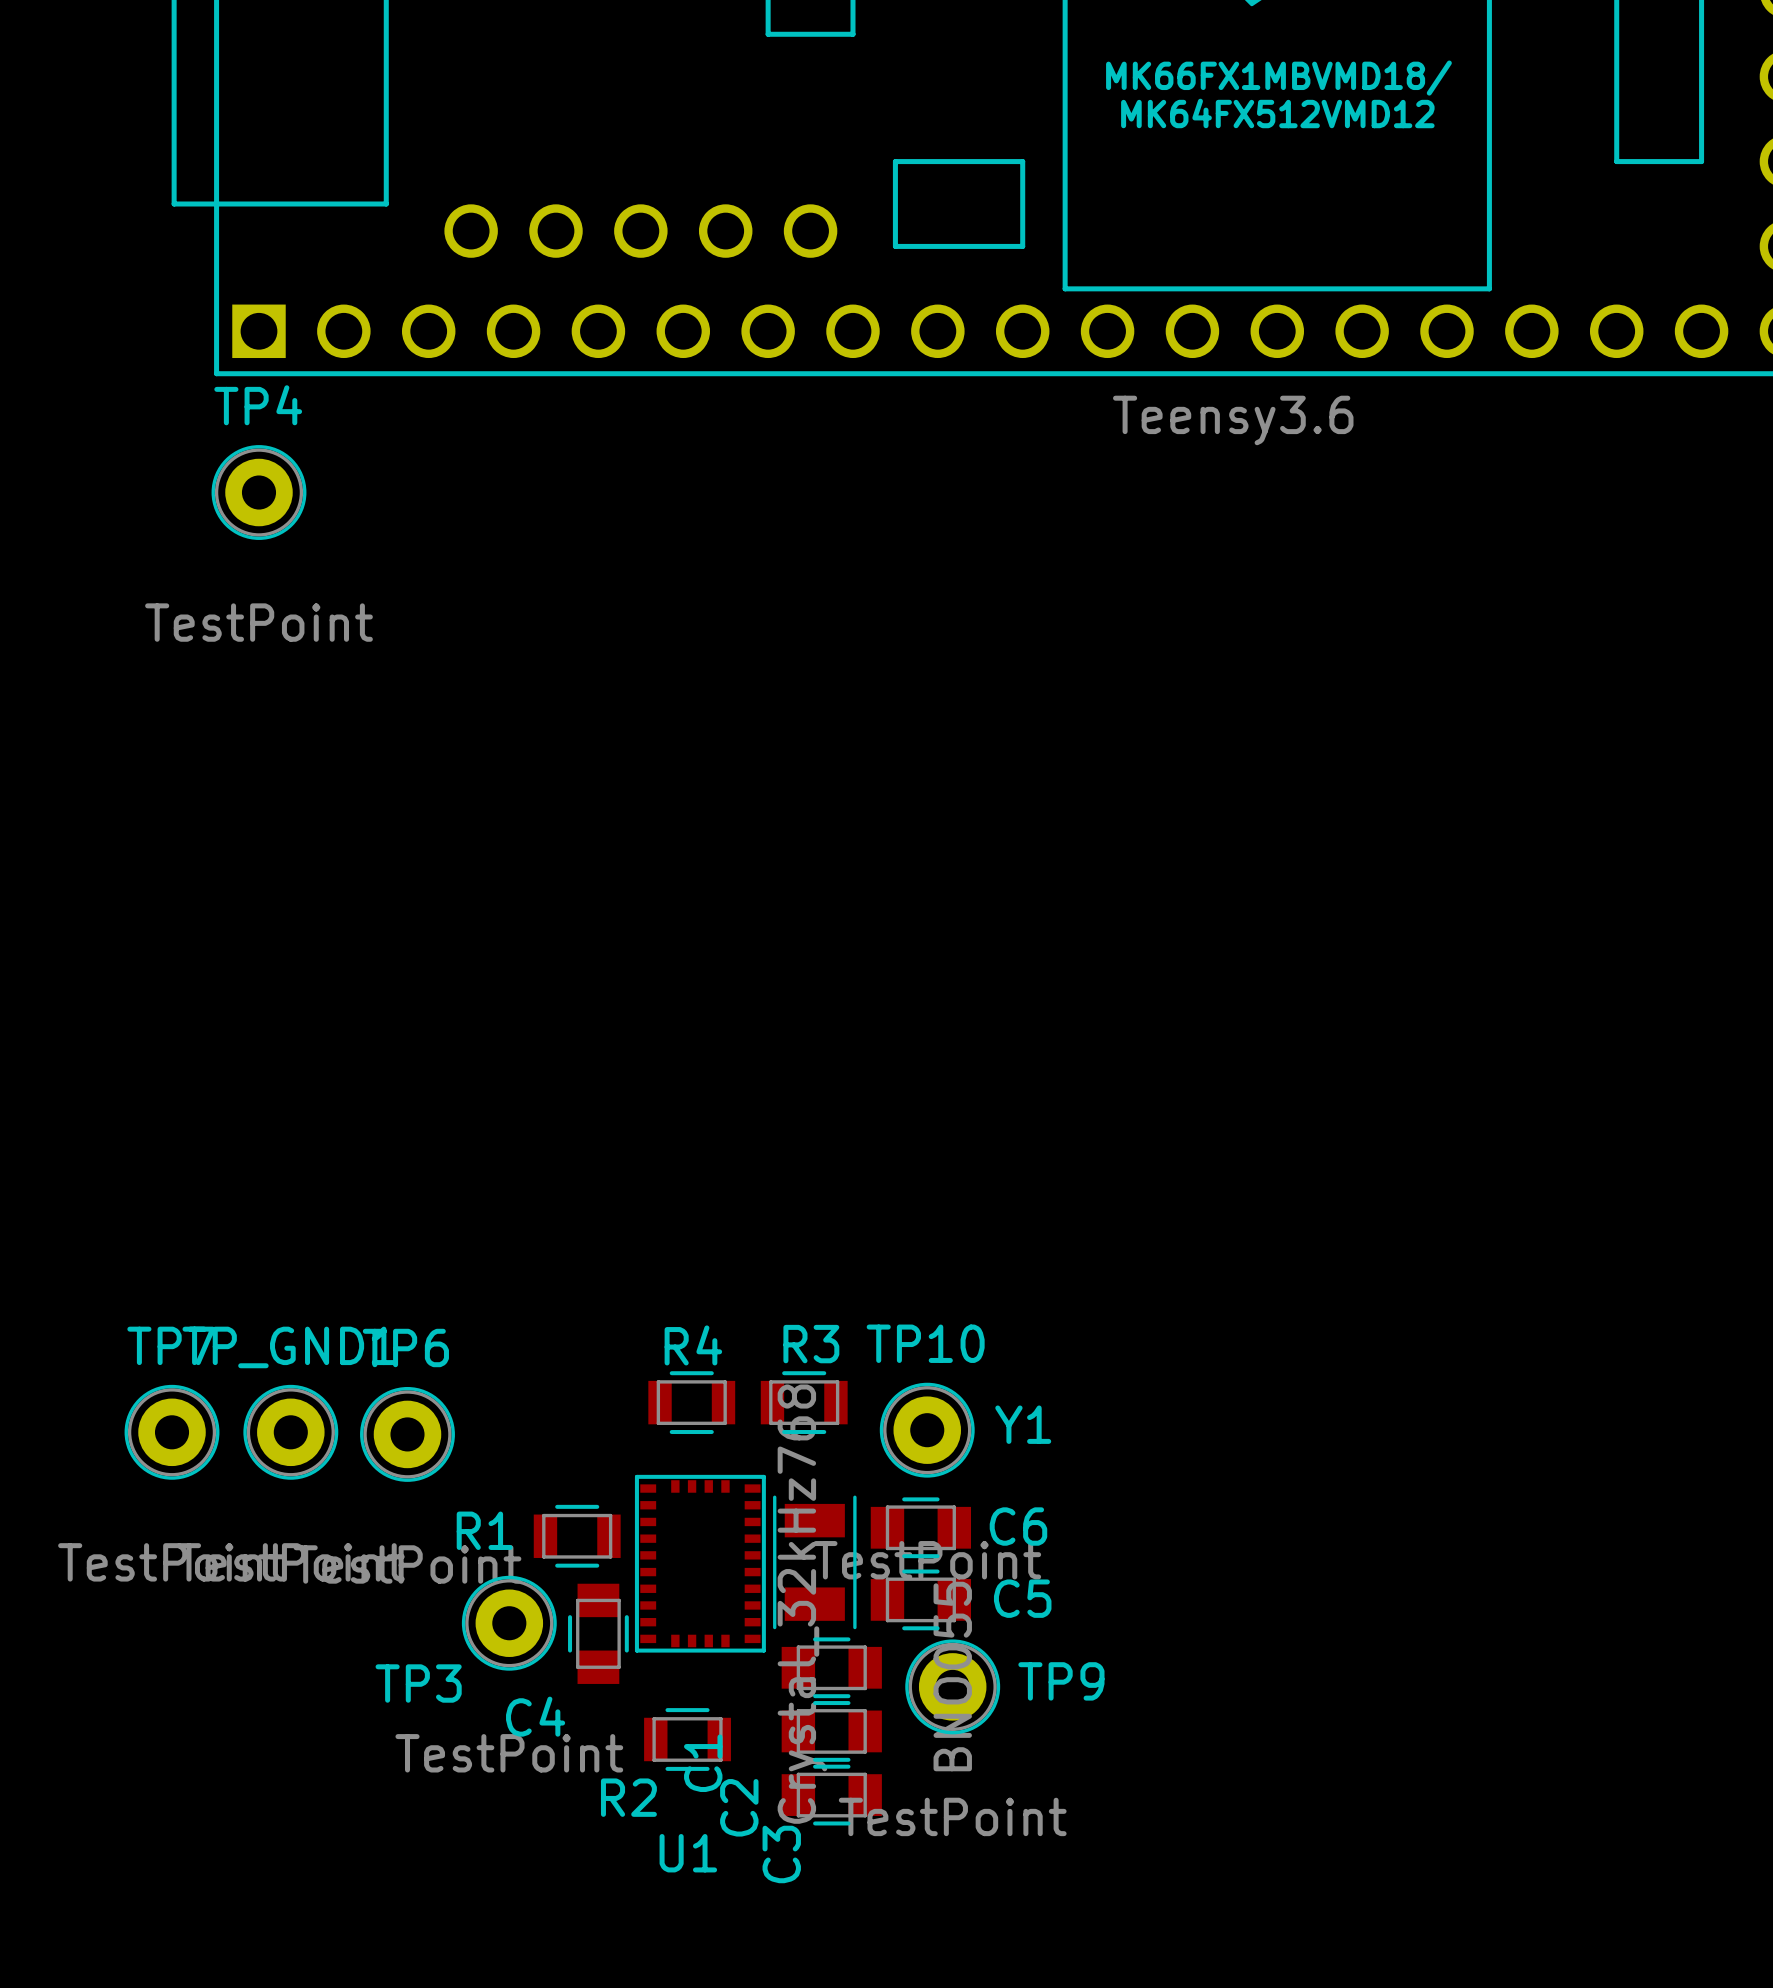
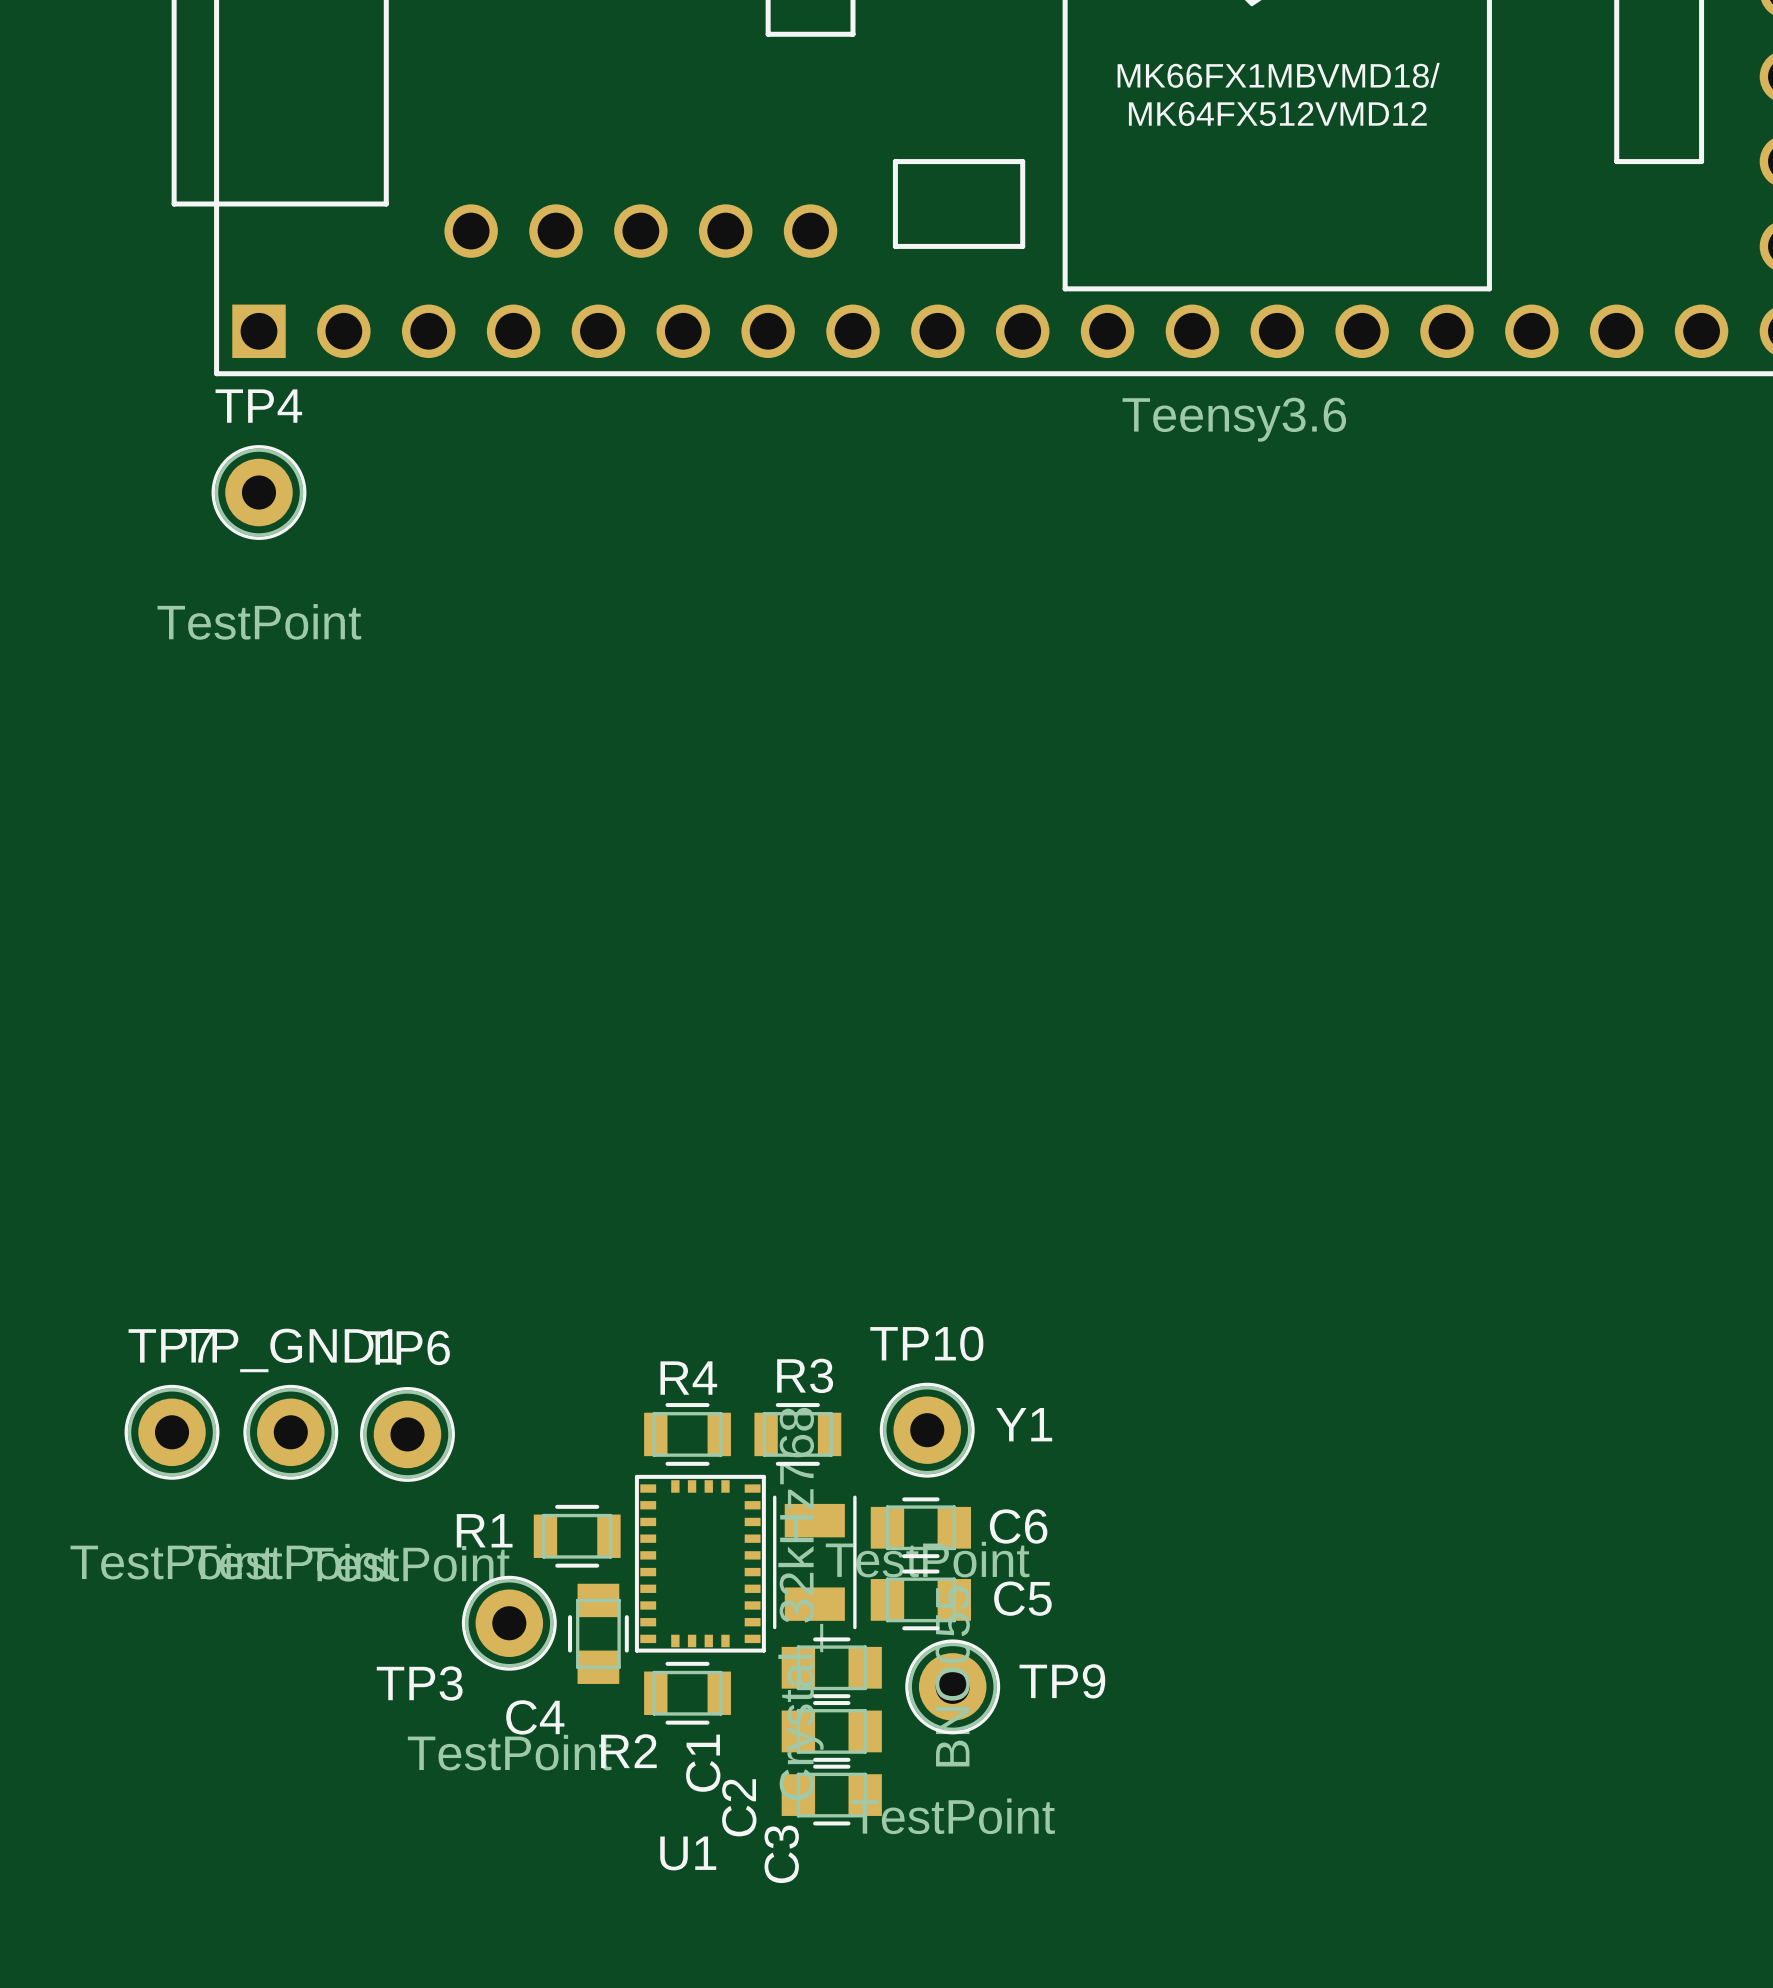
R4 position: (691, 1402) -> (687, 1434)
R3 position: (804, 1402) -> (797, 1434)
R2 position: (687, 1739) -> (687, 1693)

